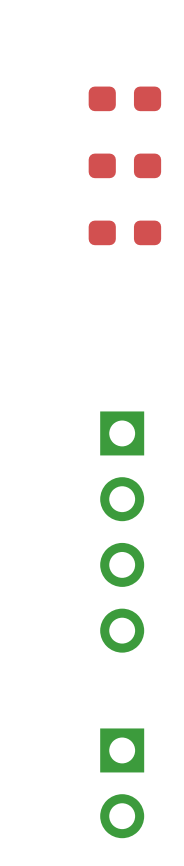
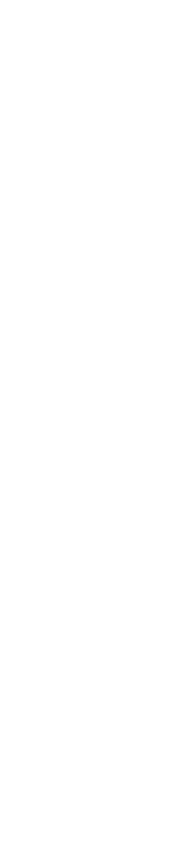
part: (124, 98) -> none
part: (124, 165) -> none
part: (124, 232) -> none
part: (122, 532) -> none
part: (122, 783) -> none

